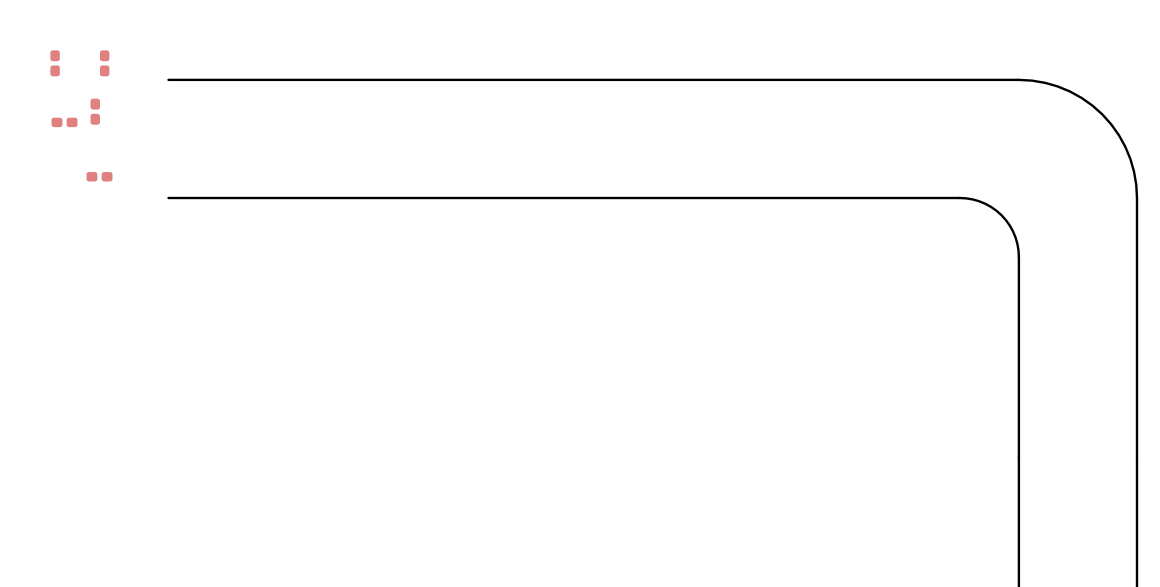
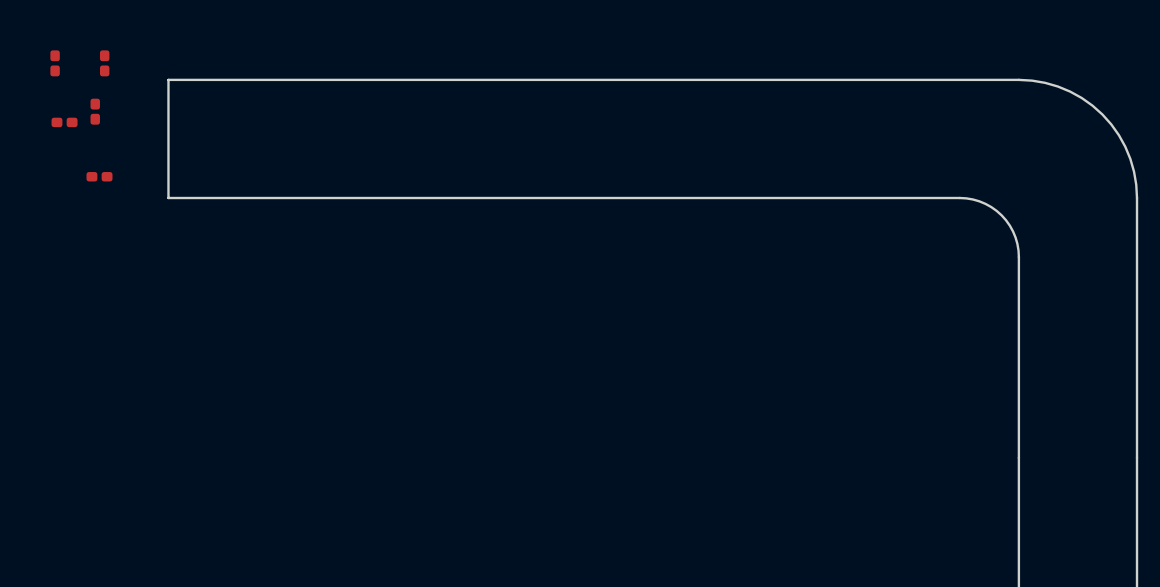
board edge: none -> (168, 79) (168, 198)

